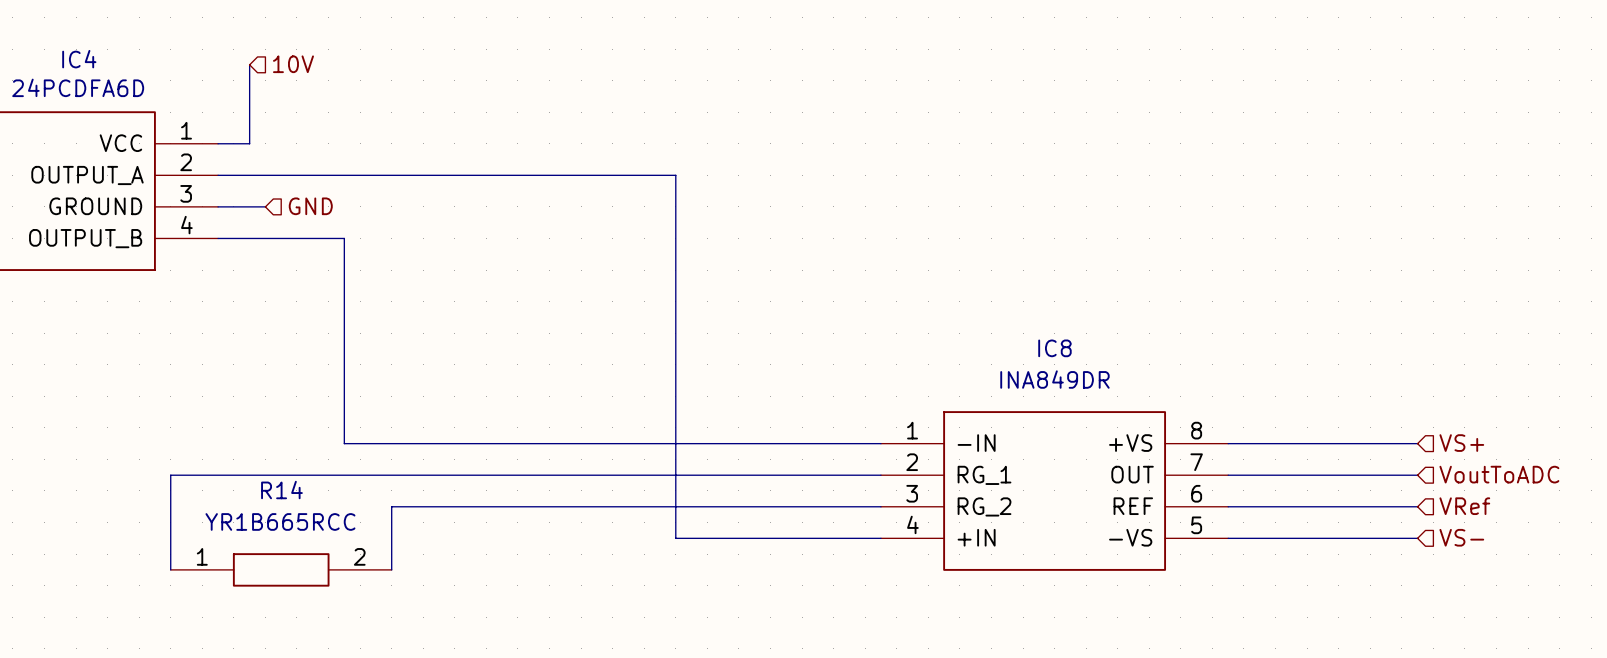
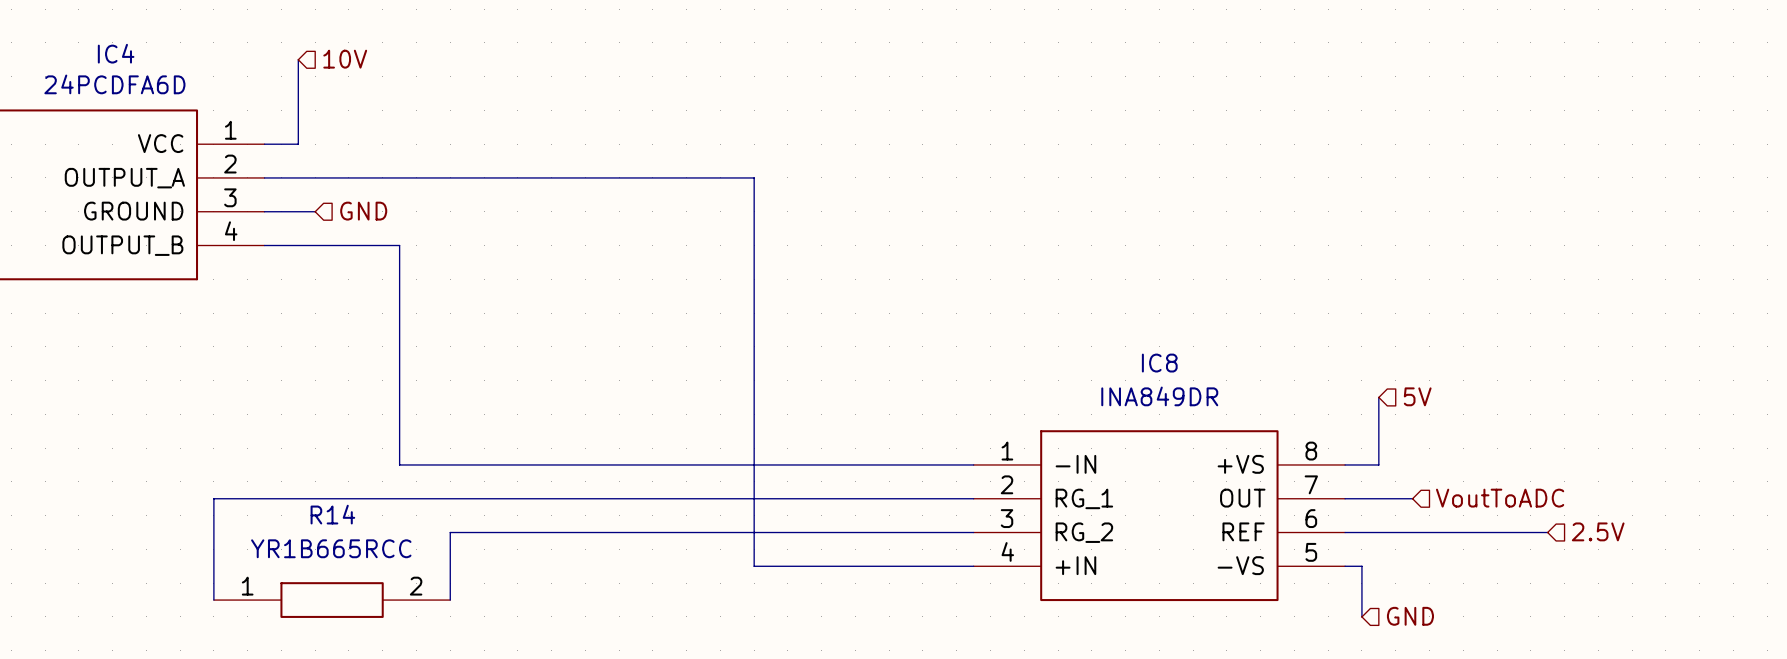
hierarchical label: none -> 5V (1417, 396)
wire: (1259, 443) (1417, 443) -> (1378, 464) (1378, 397)
hierarchical label: VS+ (1461, 443) -> none
hierarchical label position: VoutToADC (1499, 474) -> VoutToADC (1500, 498)
wire: (1291, 475) (1417, 475) -> none
hierarchical label: VRef (1464, 506) -> 2.5V (1598, 531)
hierarchical label: VS- (1461, 537) -> none
wire: (1243, 538) (1417, 538) -> (1361, 566) (1361, 616)
hierarchical label: none -> GND (1410, 616)

